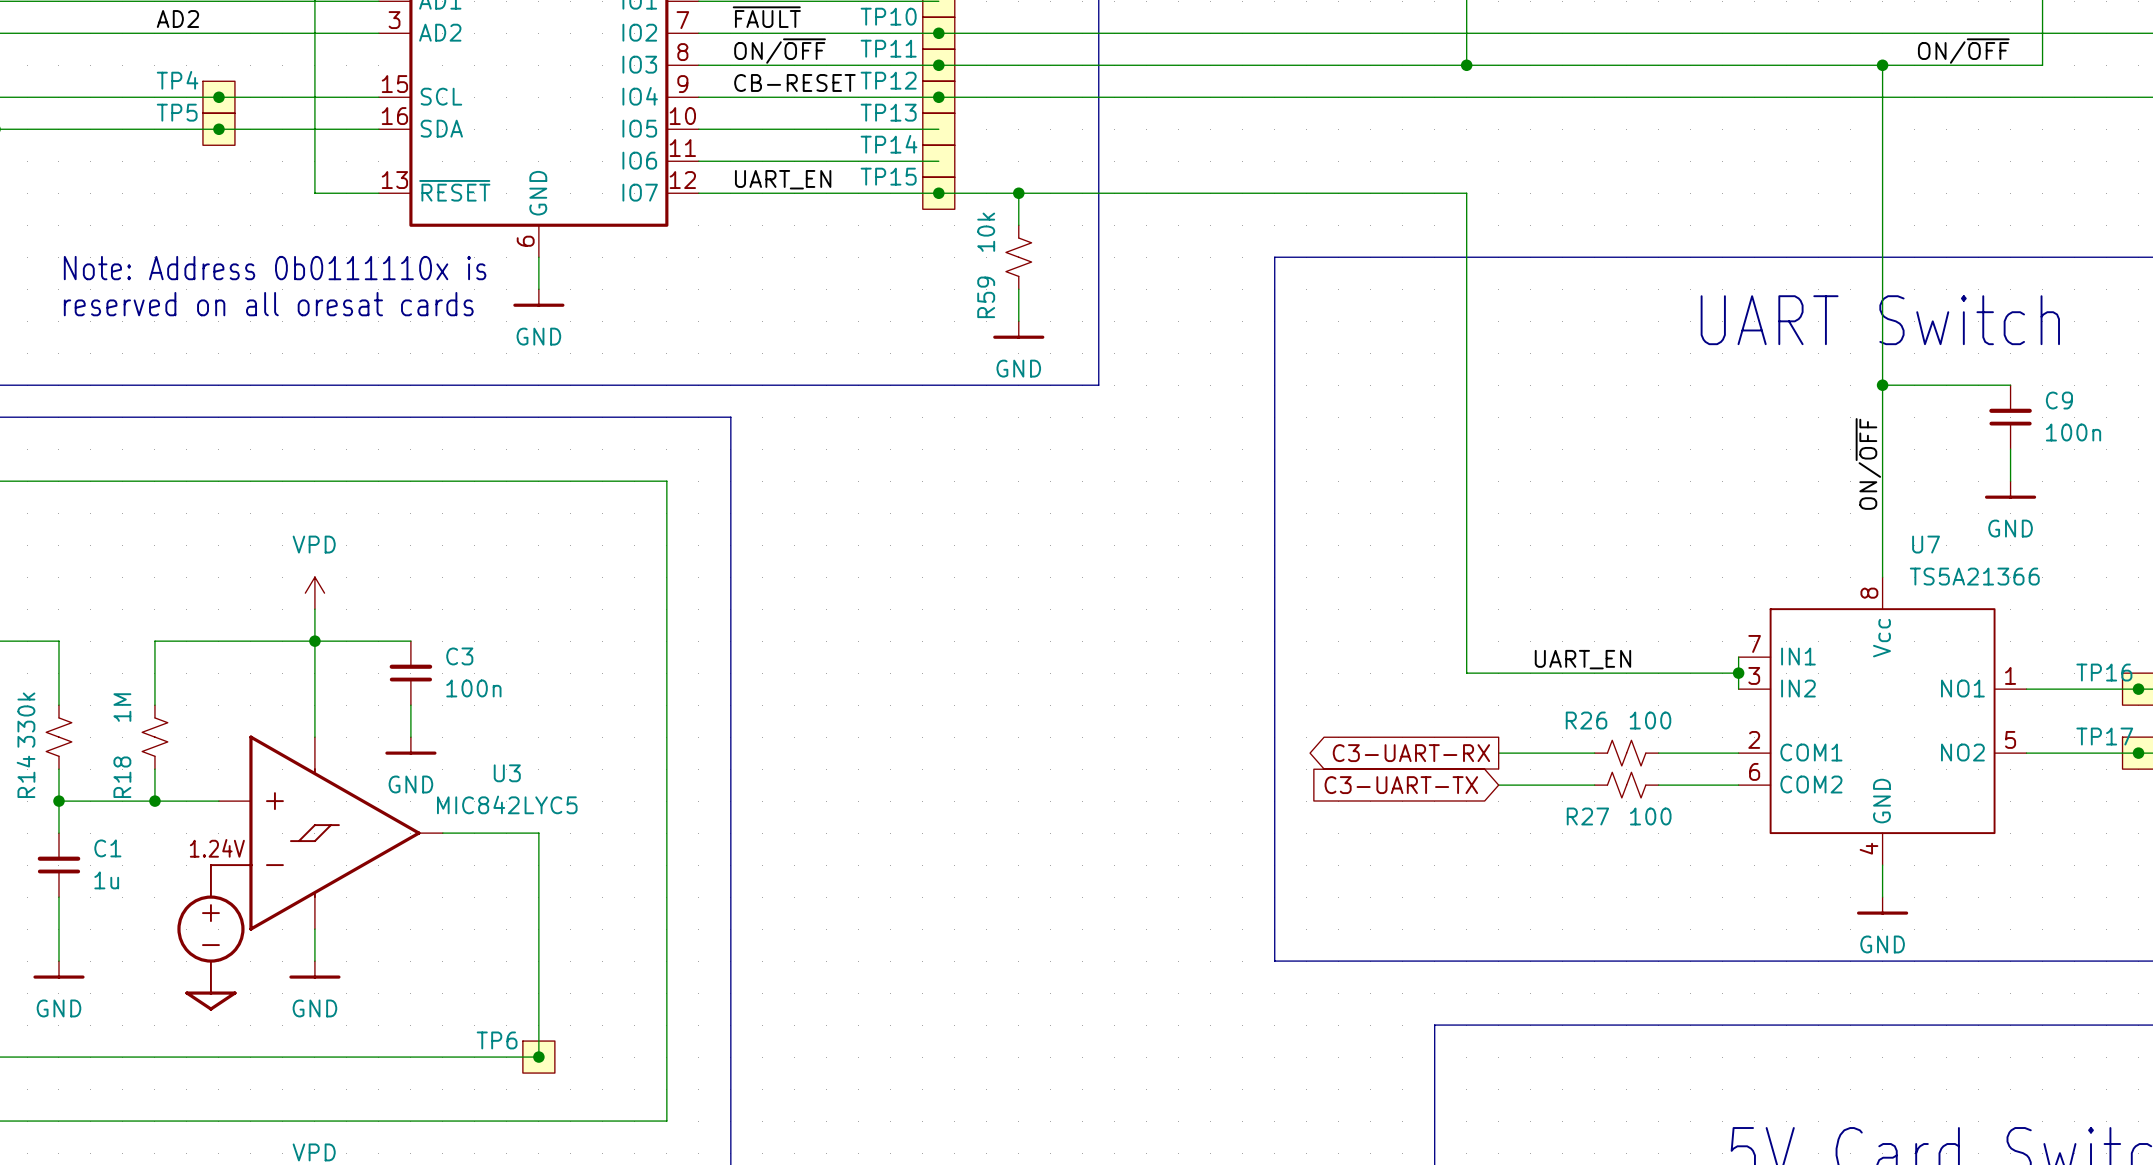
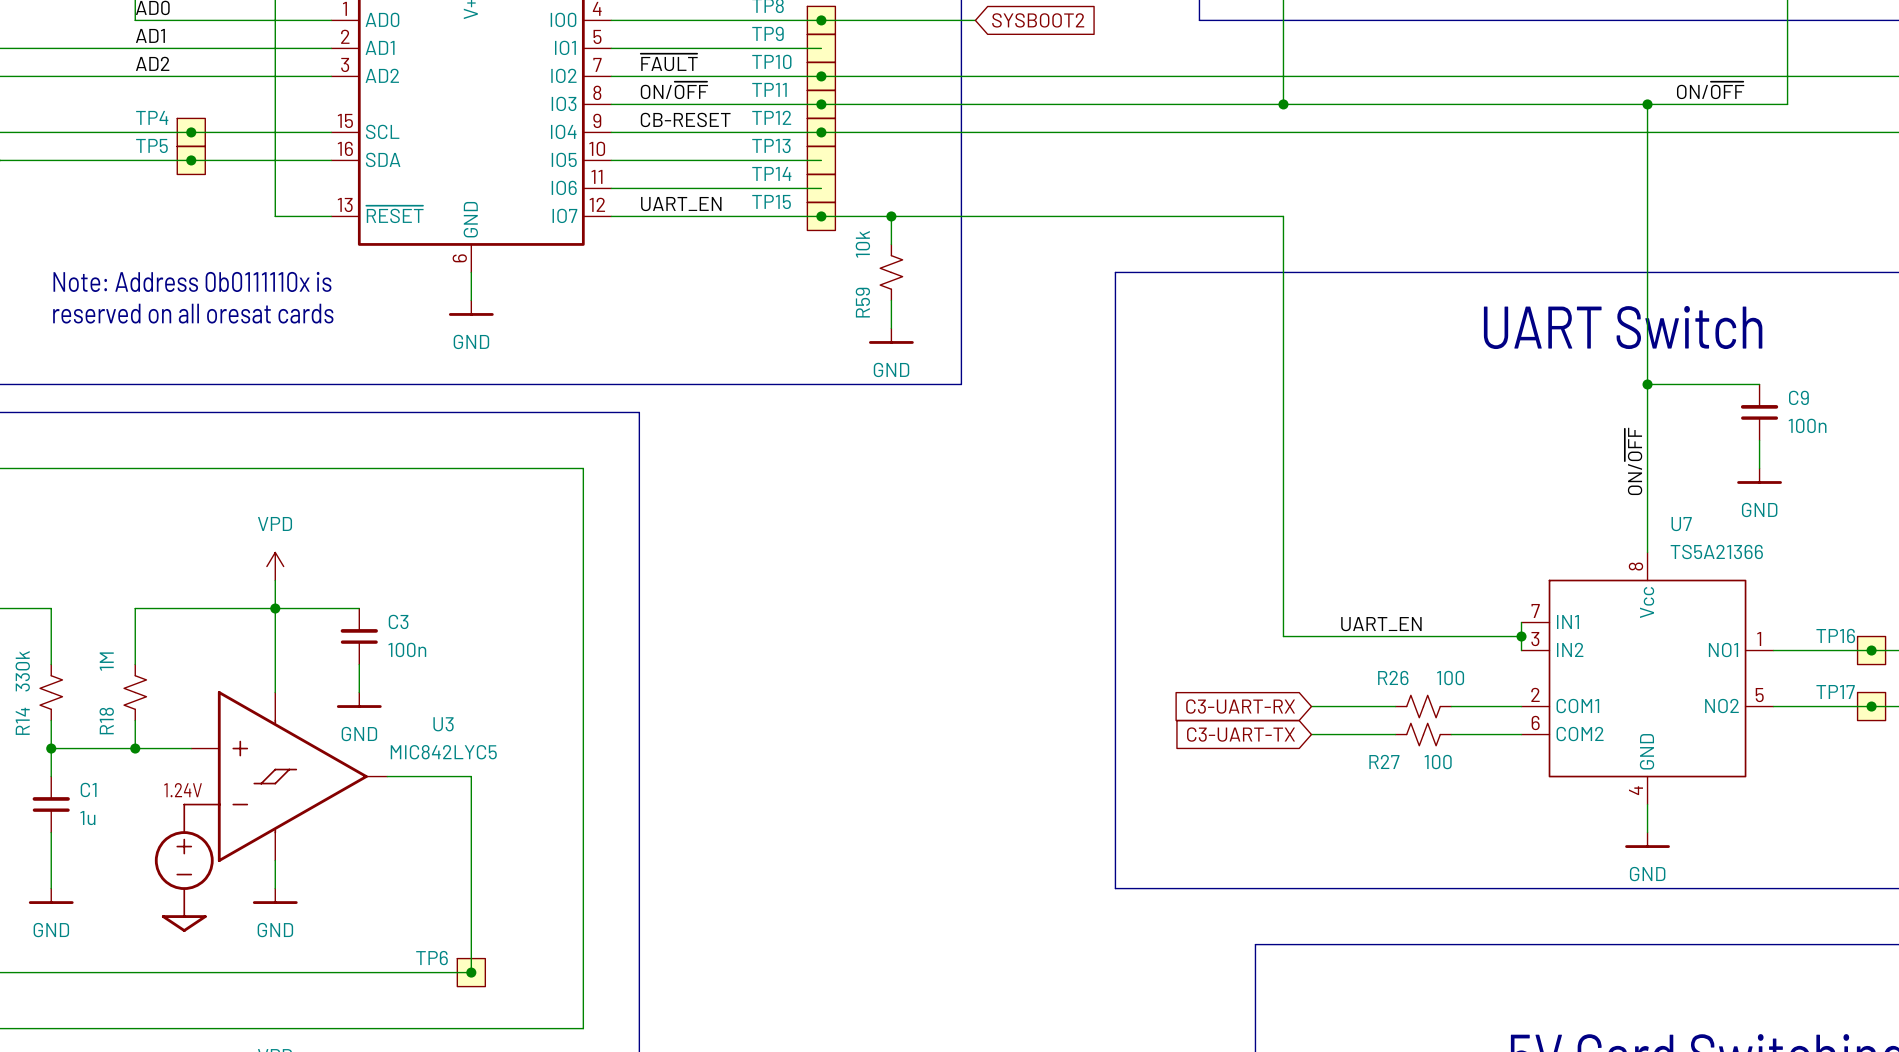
global label shape: output (1411, 753) -> input (1240, 706)

